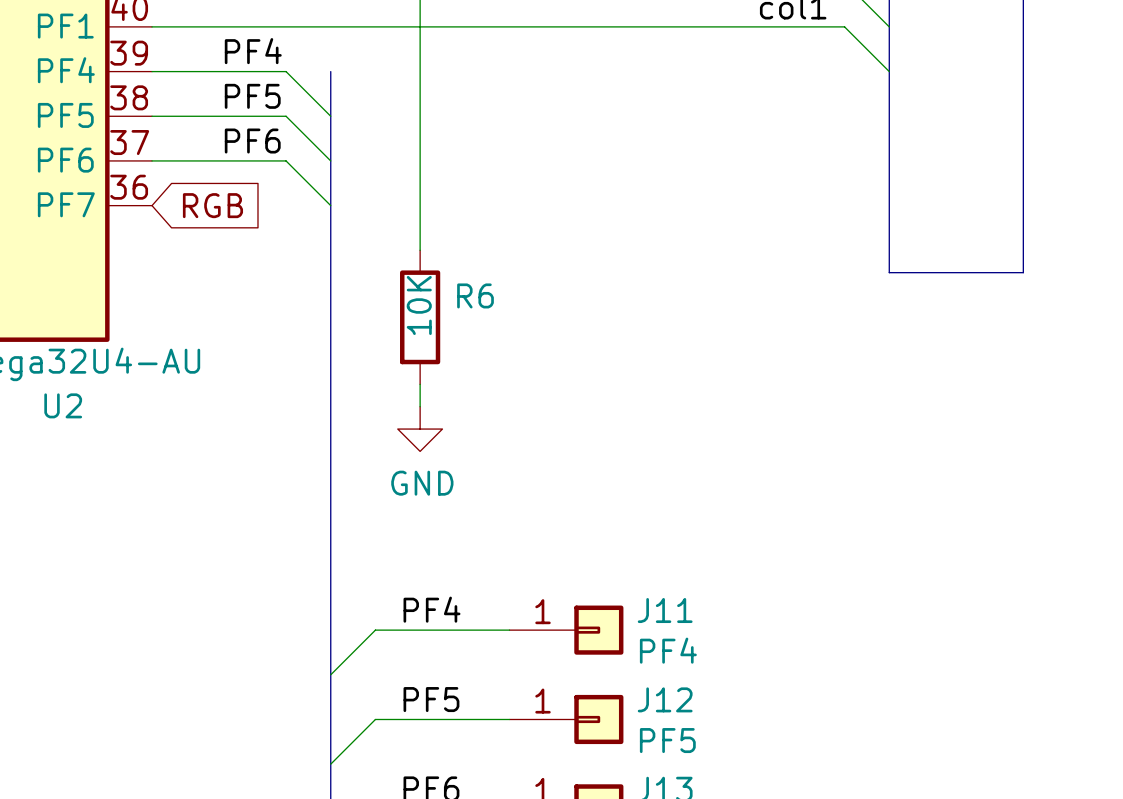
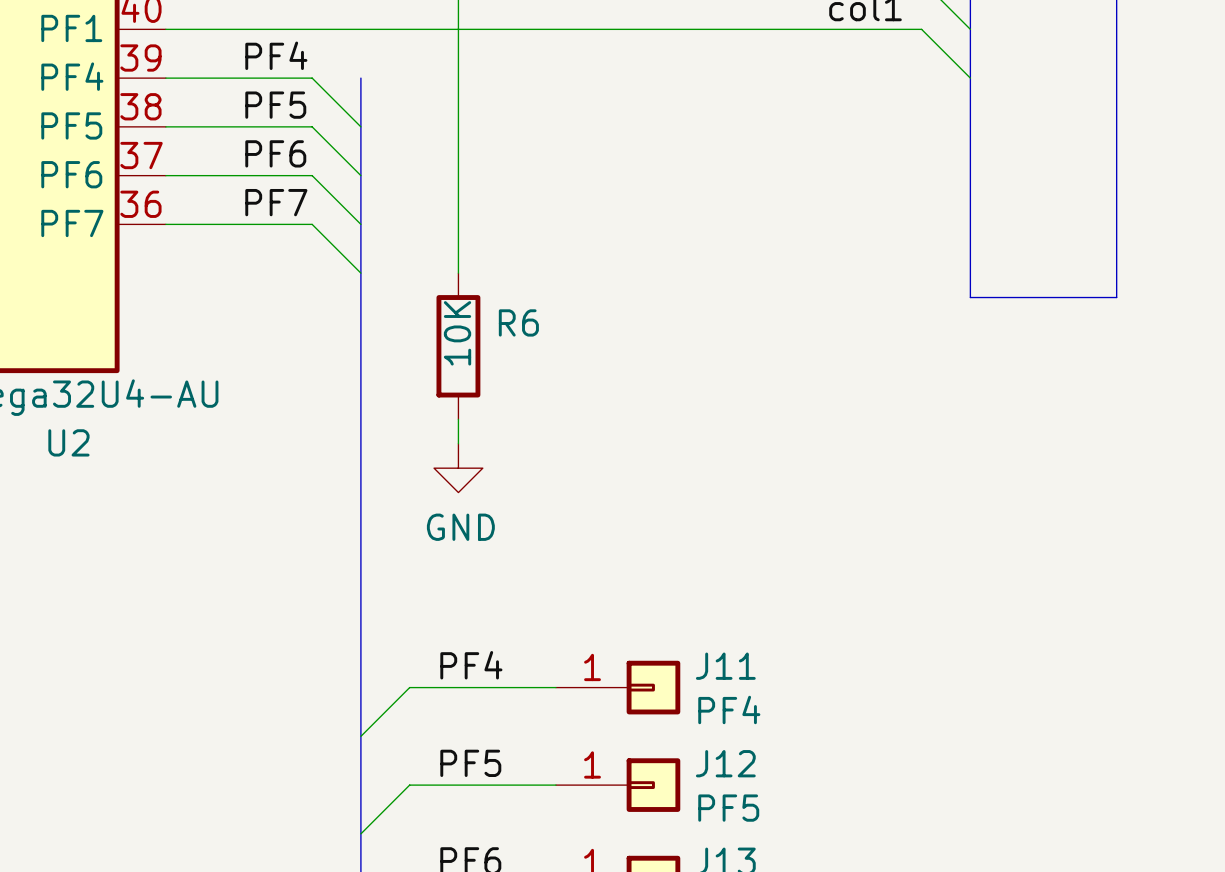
label: none -> PF7 (276, 202)
wire: none -> (165, 224) (312, 224) (360, 273)
global label: RGB (212, 205) -> none

